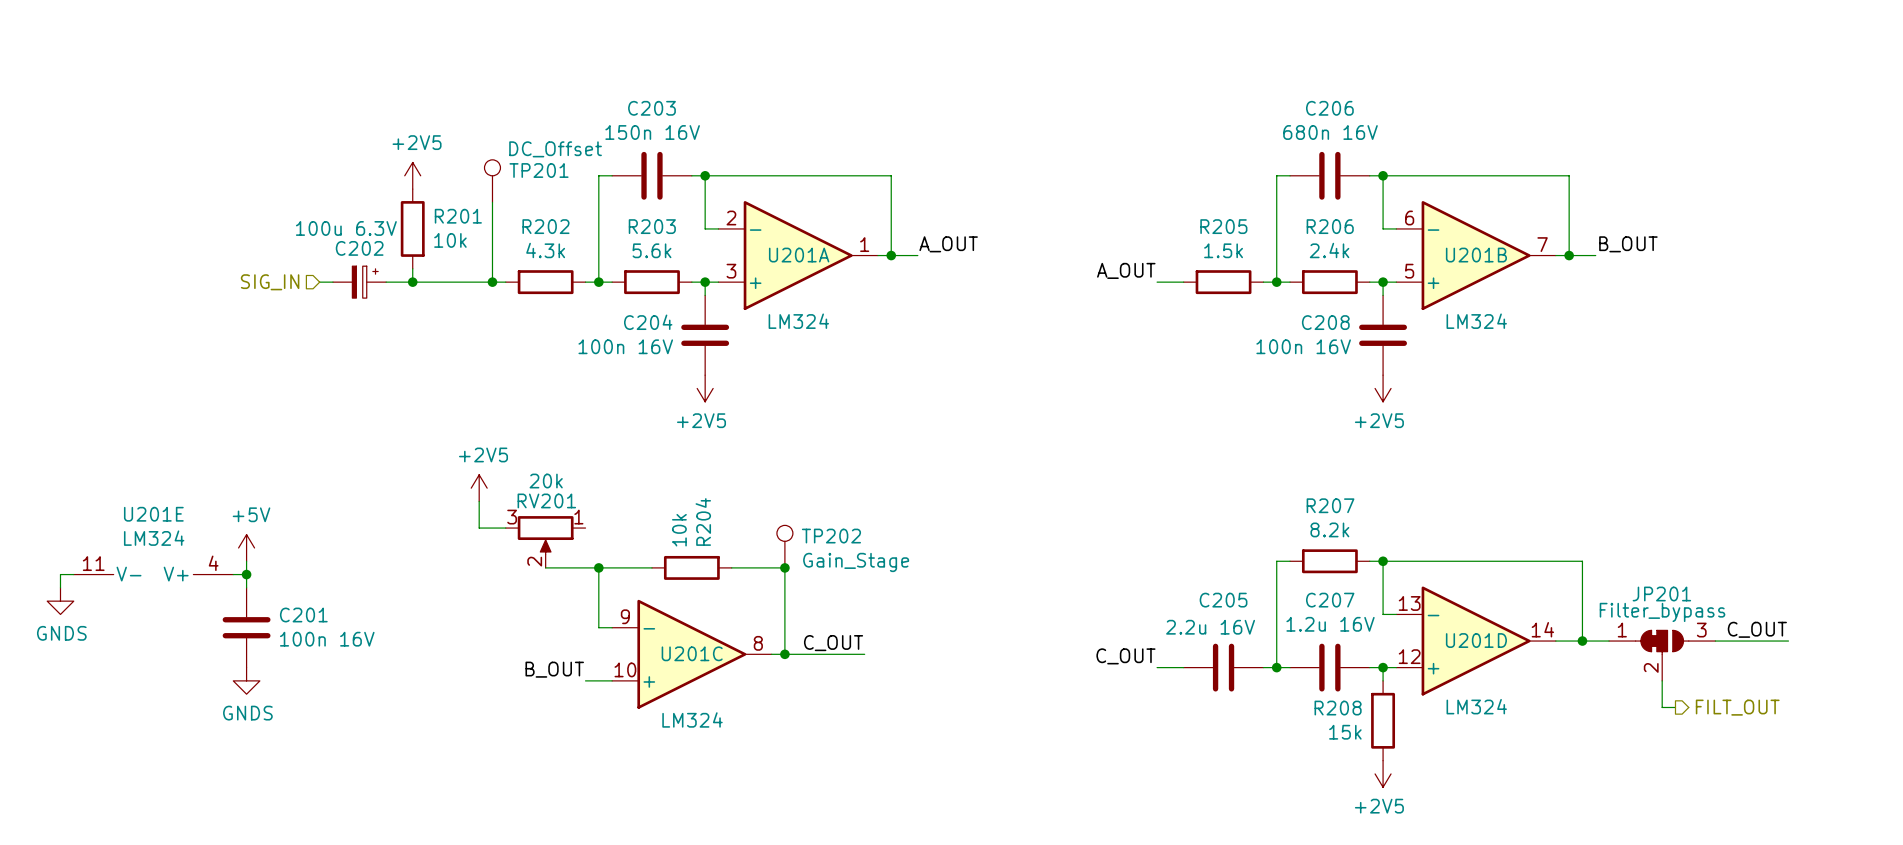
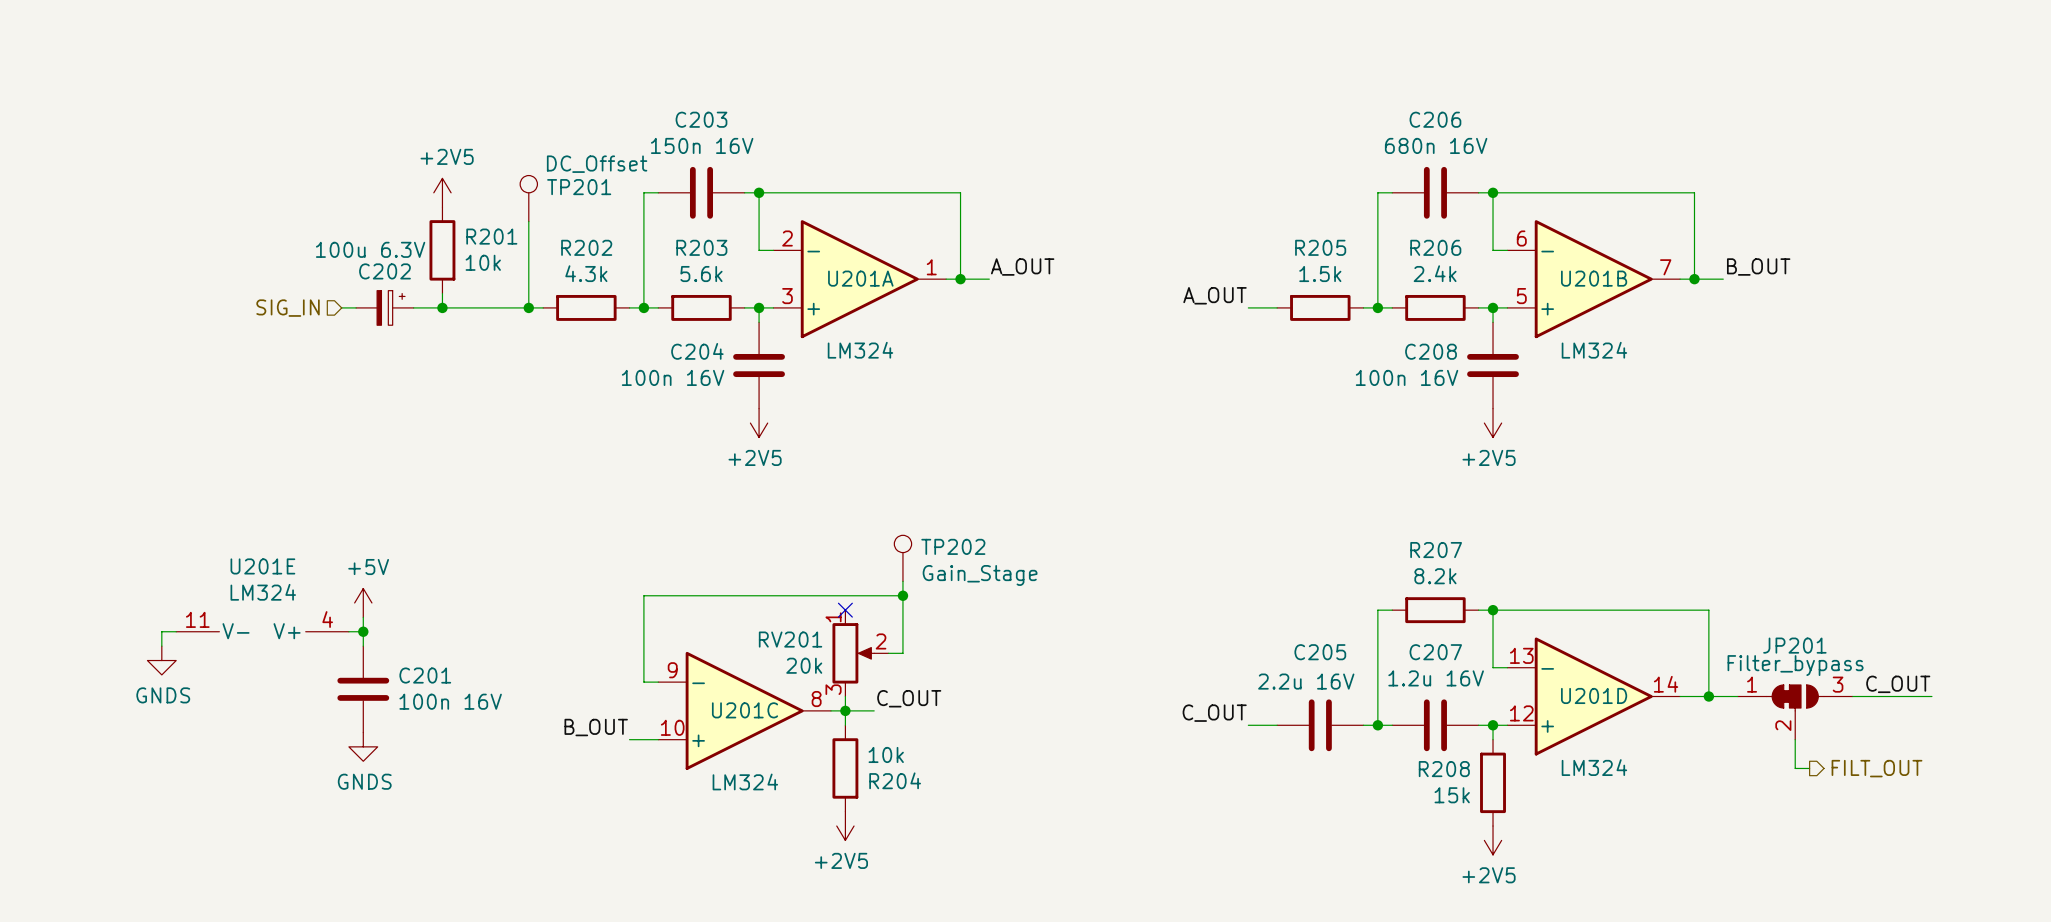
power symbol: +2V5 (479, 488) -> none
RV201 name position: RV201 (546, 500) -> RV201 (790, 639)
wire: (479, 501) (479, 528) (505, 528) -> none
wire: none -> (902, 581) (902, 653) (888, 653)
RV201 rotation: 0° (545, 535) -> 90° counterclockwise (853, 653)
RV201 position: (545, 542) -> (860, 653)
TP202 position: (784, 546) -> (902, 558)
power symbol position: +5V (246, 547) -> +5V (363, 602)
wire: none -> (902, 595) (643, 595) (643, 617)
wire: (246, 561) (246, 587) -> (363, 617) (363, 646)
no-connect mark: none -> (845, 610)
wire: (545, 567) (651, 567) -> none
junction: (598, 567) -> none
R204 rotation: 0° (691, 567) -> 90° clockwise (845, 768)
R204 position: (691, 567) -> (845, 768)
wire: (731, 567) (784, 567) (784, 641) -> none
junction position: (784, 567) -> (902, 595)
wire: (73, 574) (60, 574) (60, 587) -> (176, 631) (161, 631) (161, 646)
U201E position: (153, 574) -> (262, 631)
wire: (233, 574) (246, 574) -> (348, 631) (363, 631)
junction: (246, 574) -> none
junction: none -> (363, 631)
power symbol: GNDS (60, 601) -> none
power symbol: none -> GNDS (161, 660)
C201 position: (246, 627) -> (363, 689)
label position: C_OUT (833, 643) -> C_OUT (909, 698)
wire: none -> (845, 710) (845, 725)
wire: (811, 654) (864, 654) -> none
power symbol: GNDS (246, 680) -> none
power symbol: none -> GNDS (363, 746)
power symbol: none -> +2V5 (845, 826)

